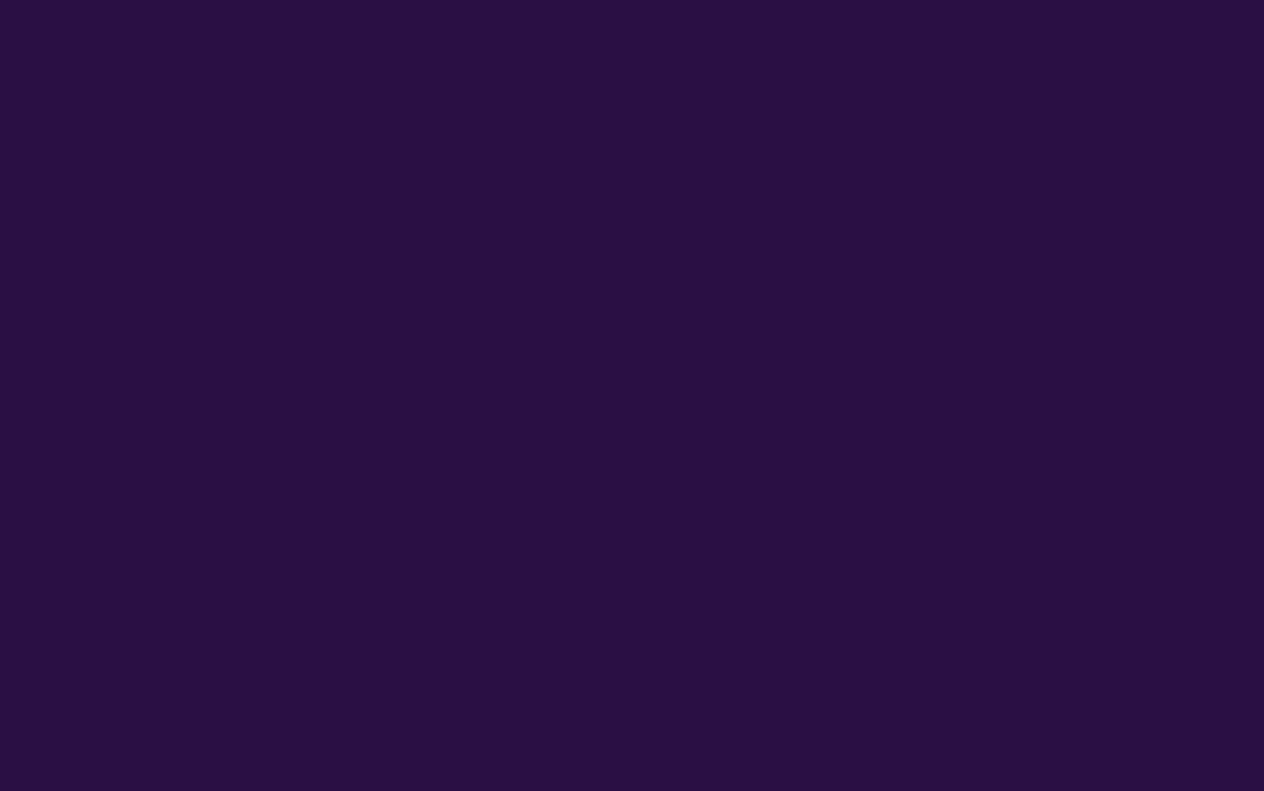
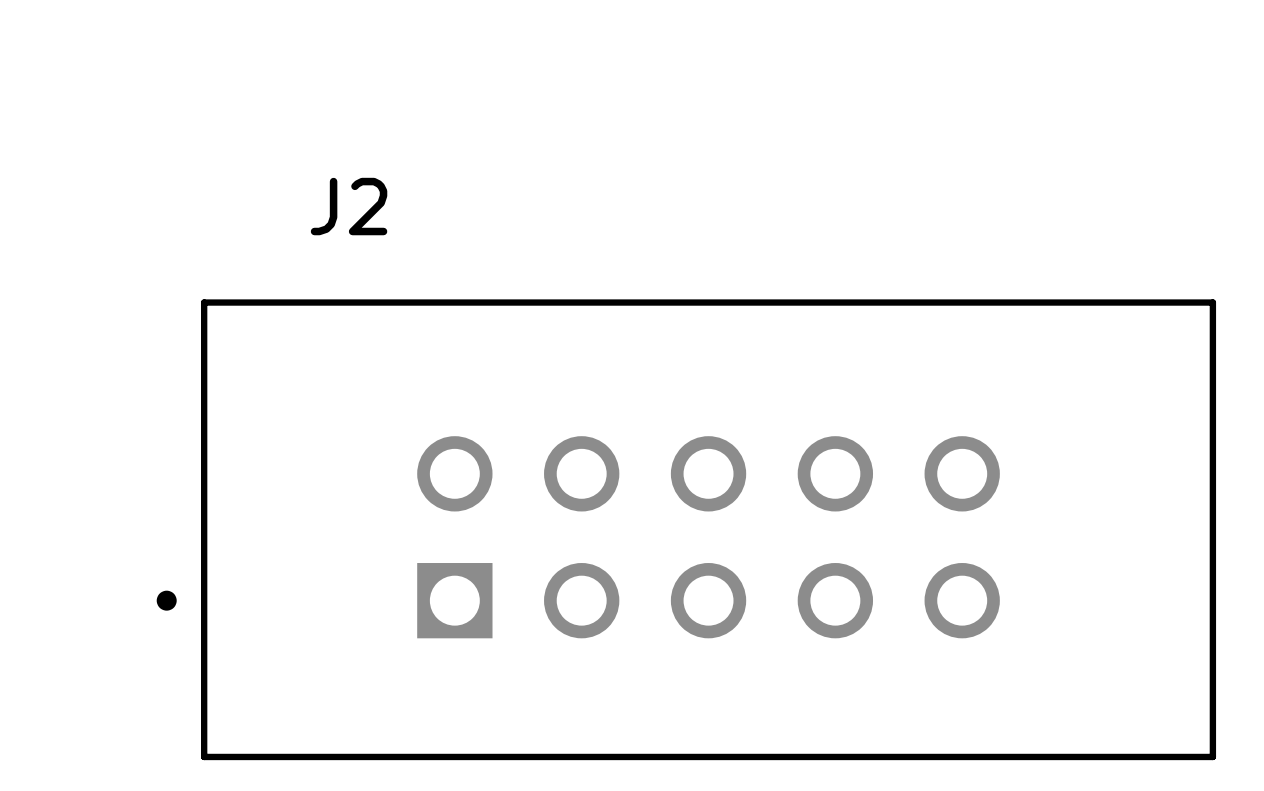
J2: none -> (686, 529)

